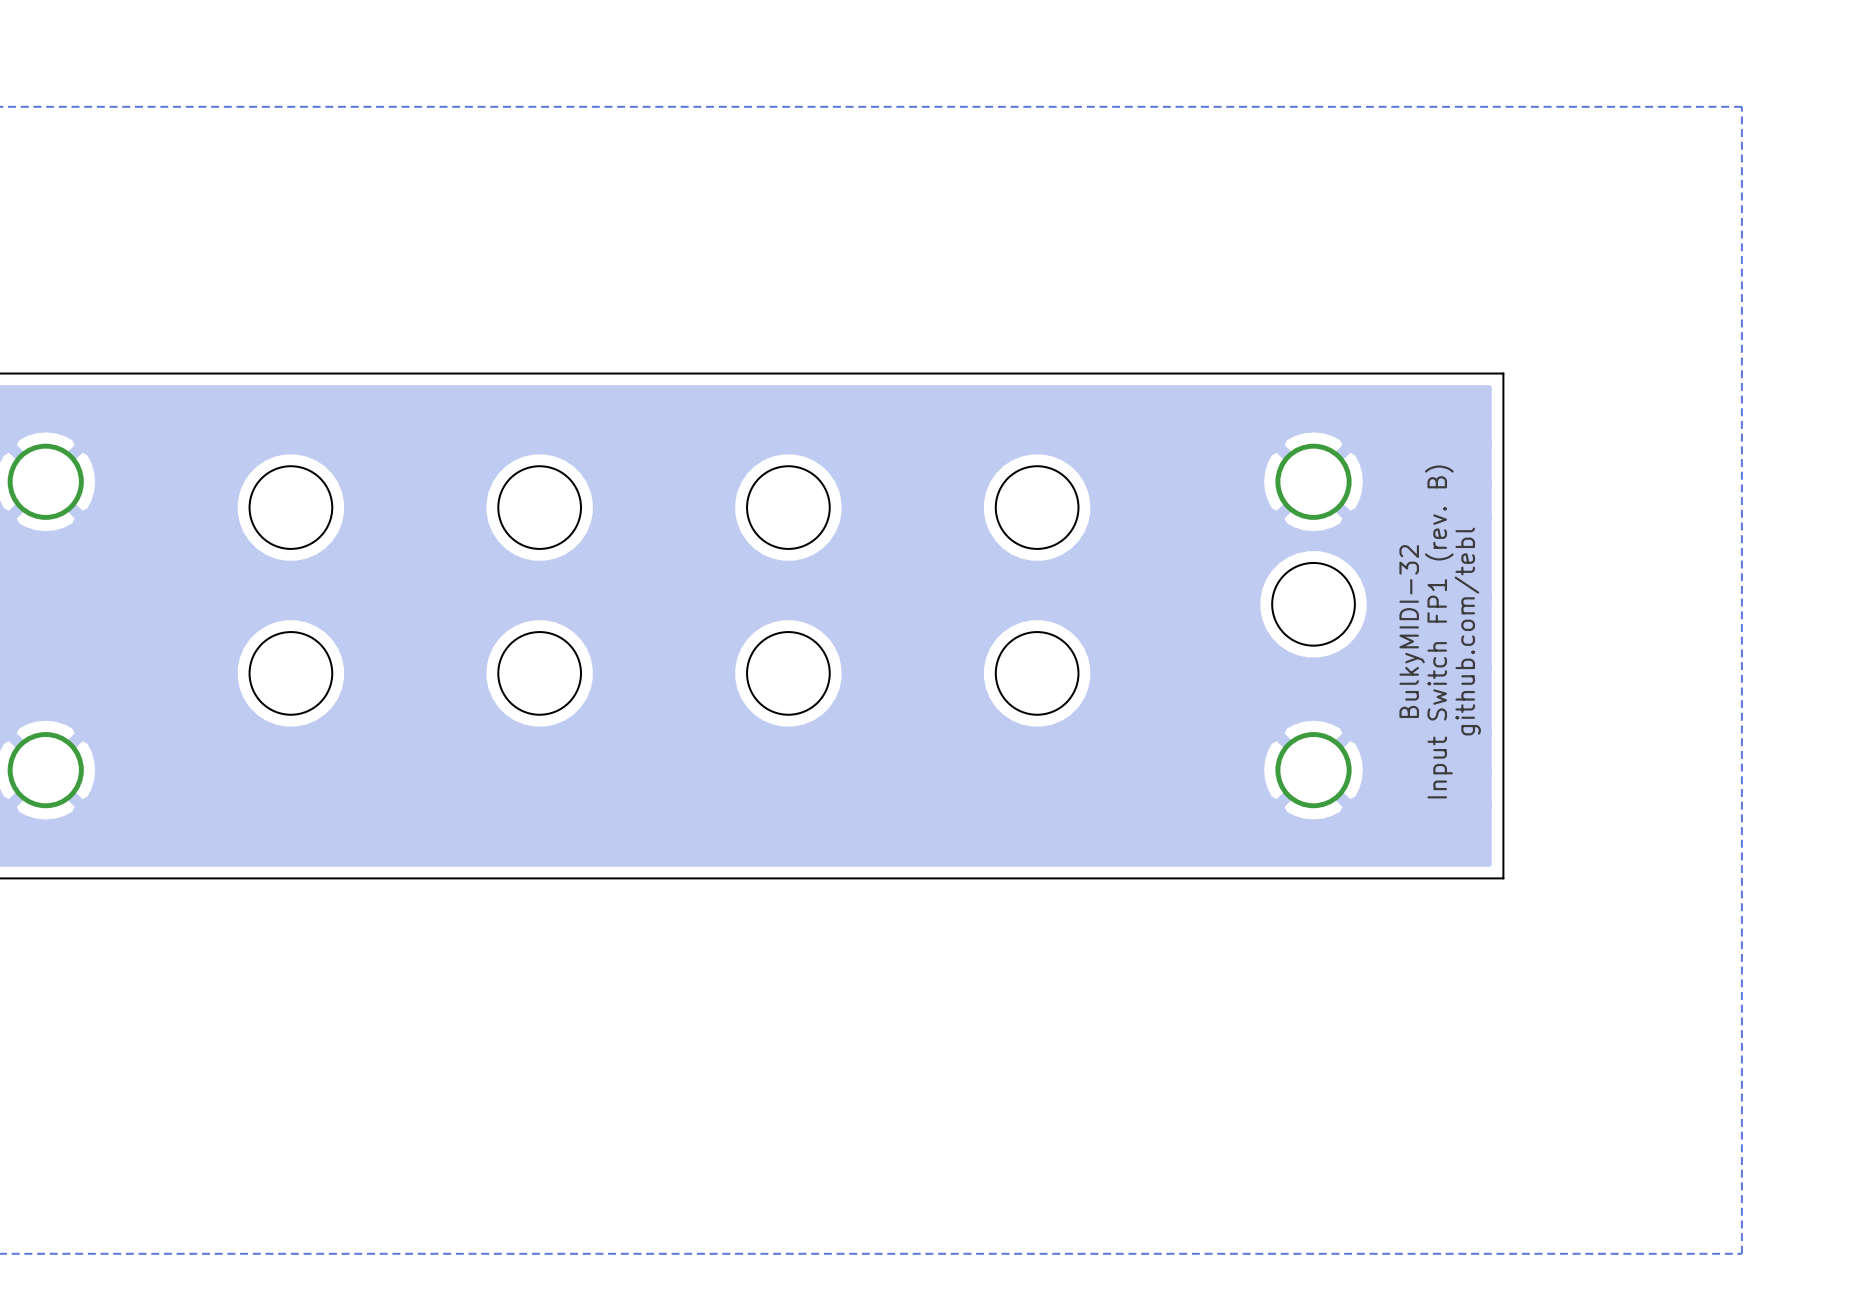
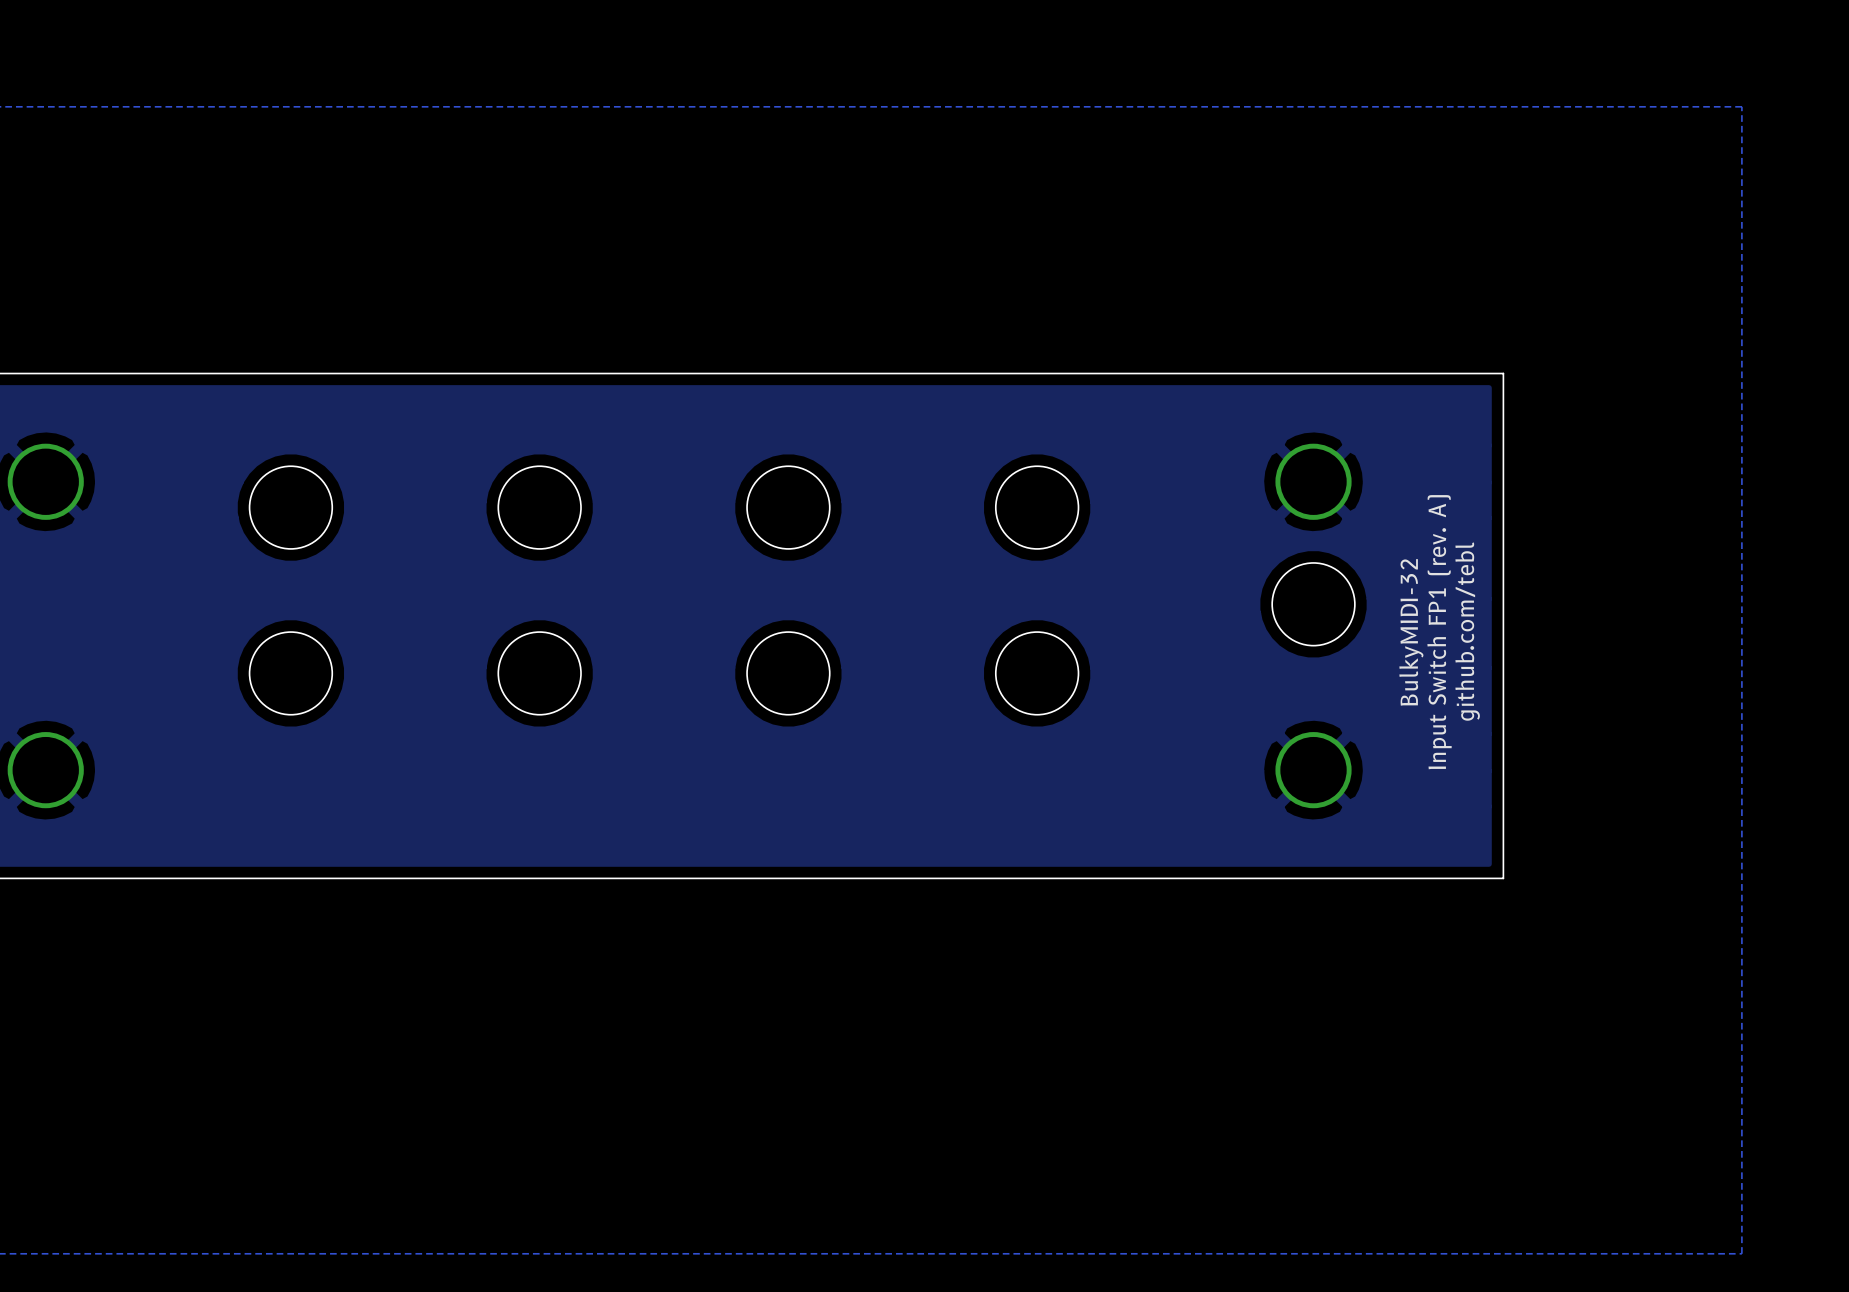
text: Input Switch FP1 (rev. B) (1439, 631) -> Input Switch FP1 (rev. A) (1439, 632)

